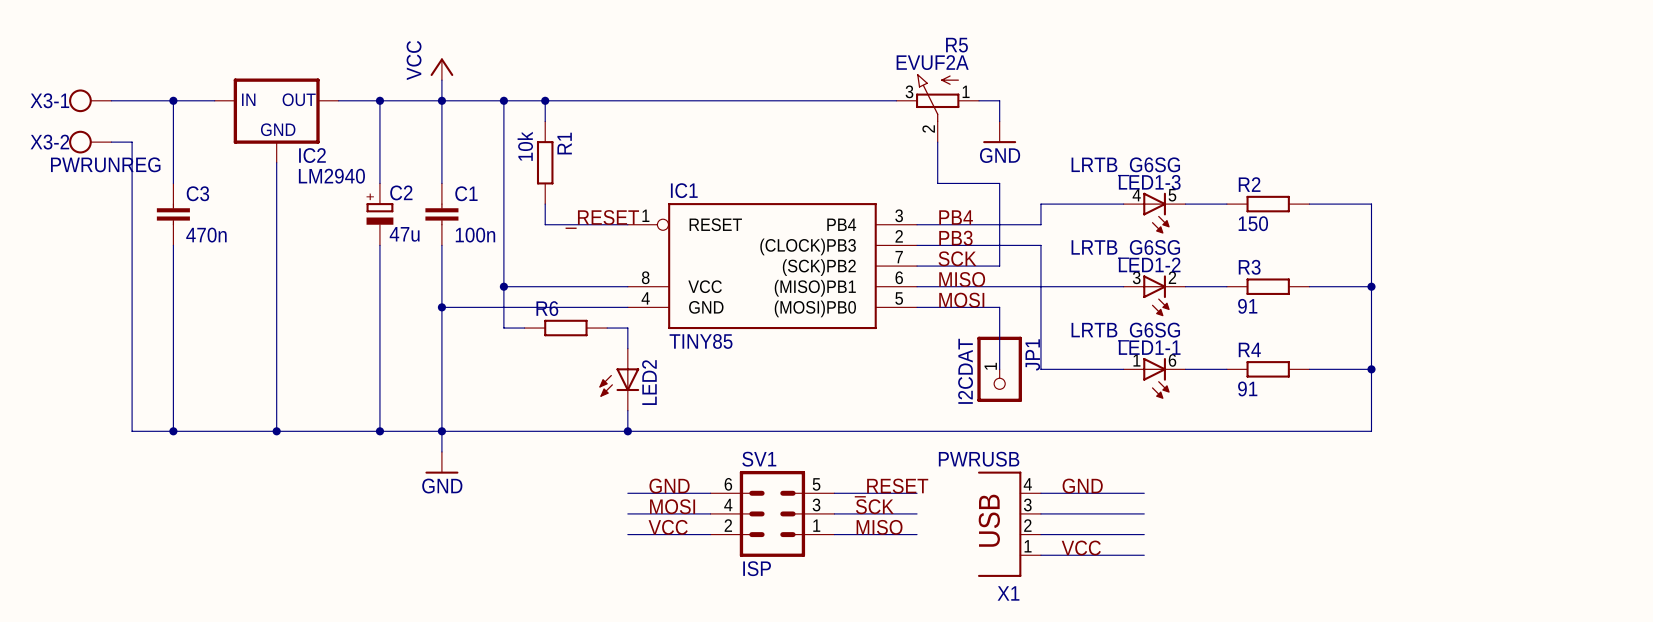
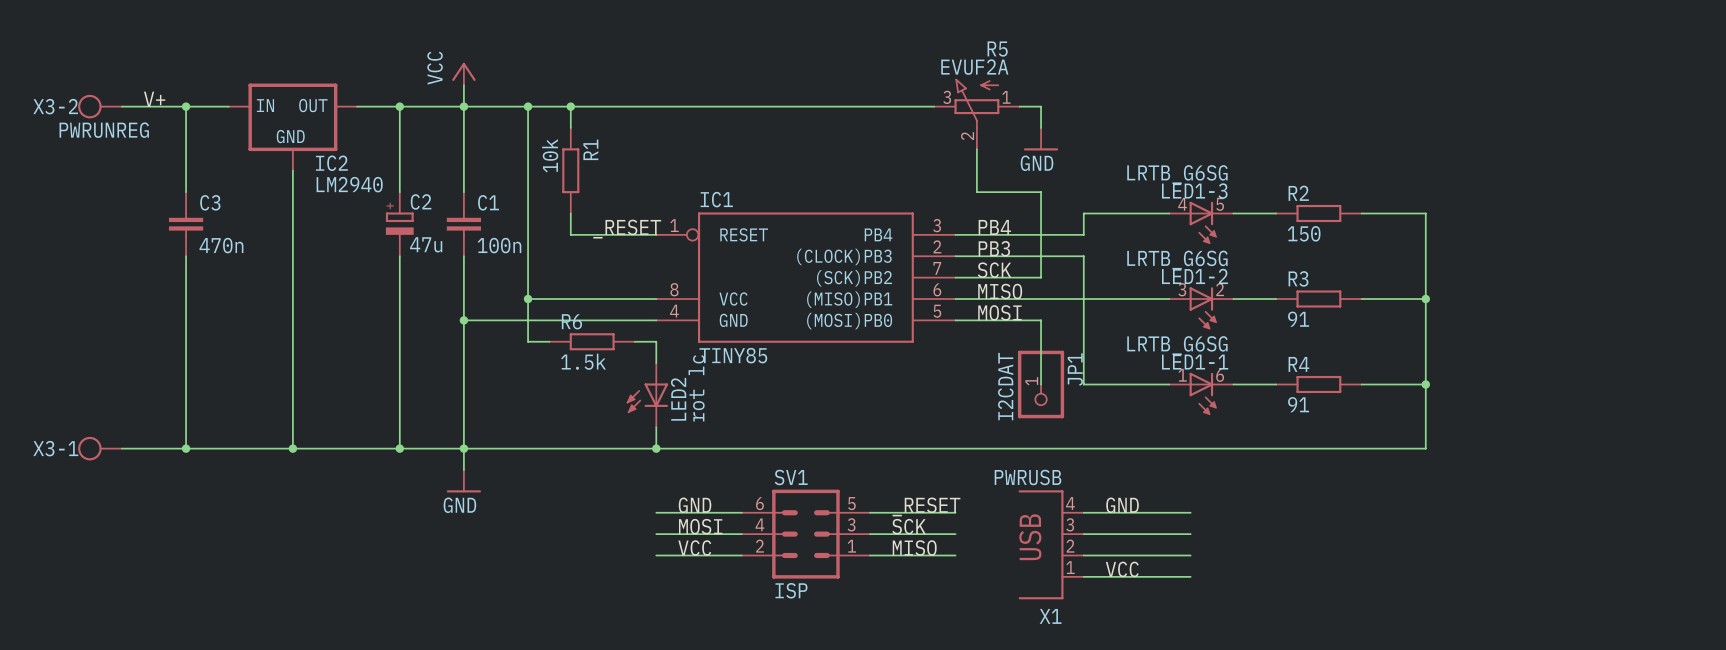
label: none -> V+ (154, 99)
X3-1 name: X3-1 (49, 100) -> X3-2 (55, 106)
X3-1 value: none -> PWRUNREG (104, 130)
X3-2: PWRUNREG (90, 142) -> none
wire: (111, 142) (132, 142) (132, 431) -> (121, 448) (143, 448)
R6 value: none -> 1.5k (583, 361)
LED2 value: none -> rot lc (696, 388)
X3-1: none -> (100, 448)

